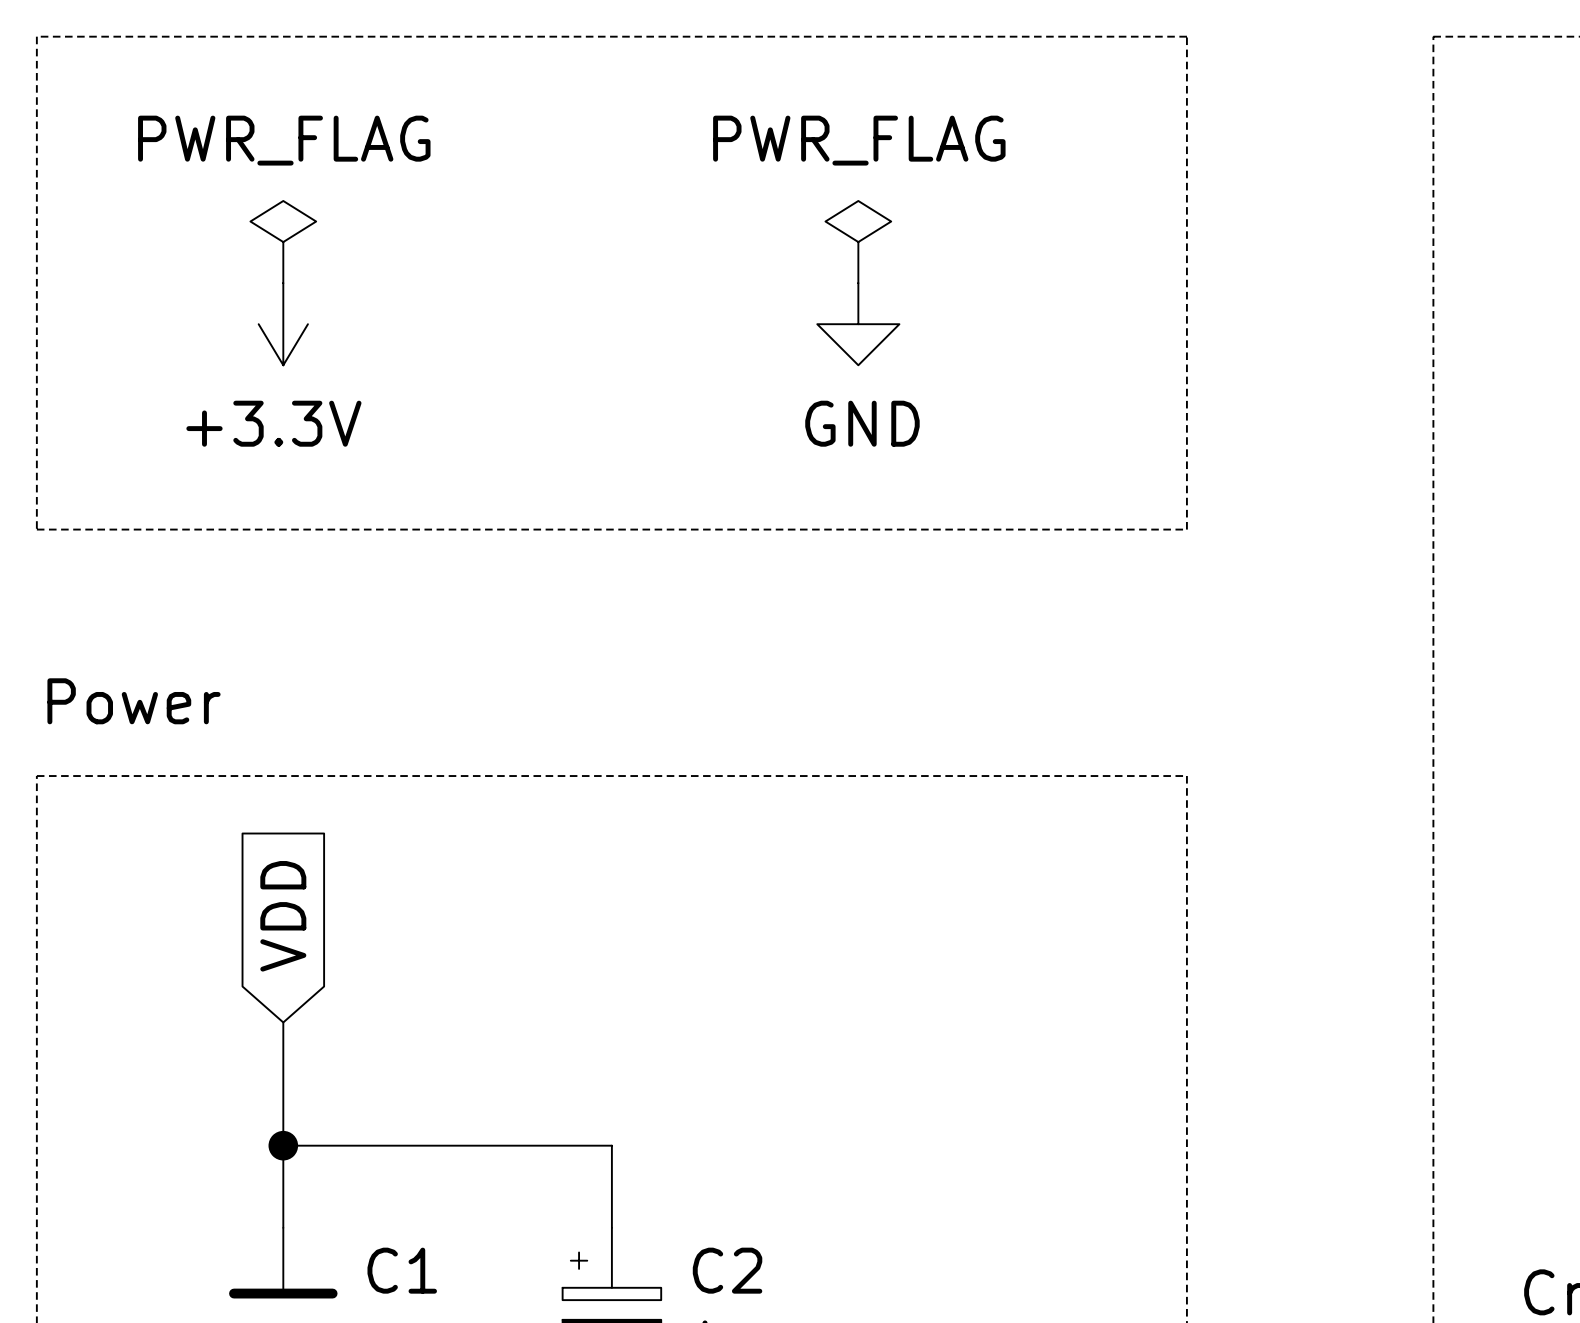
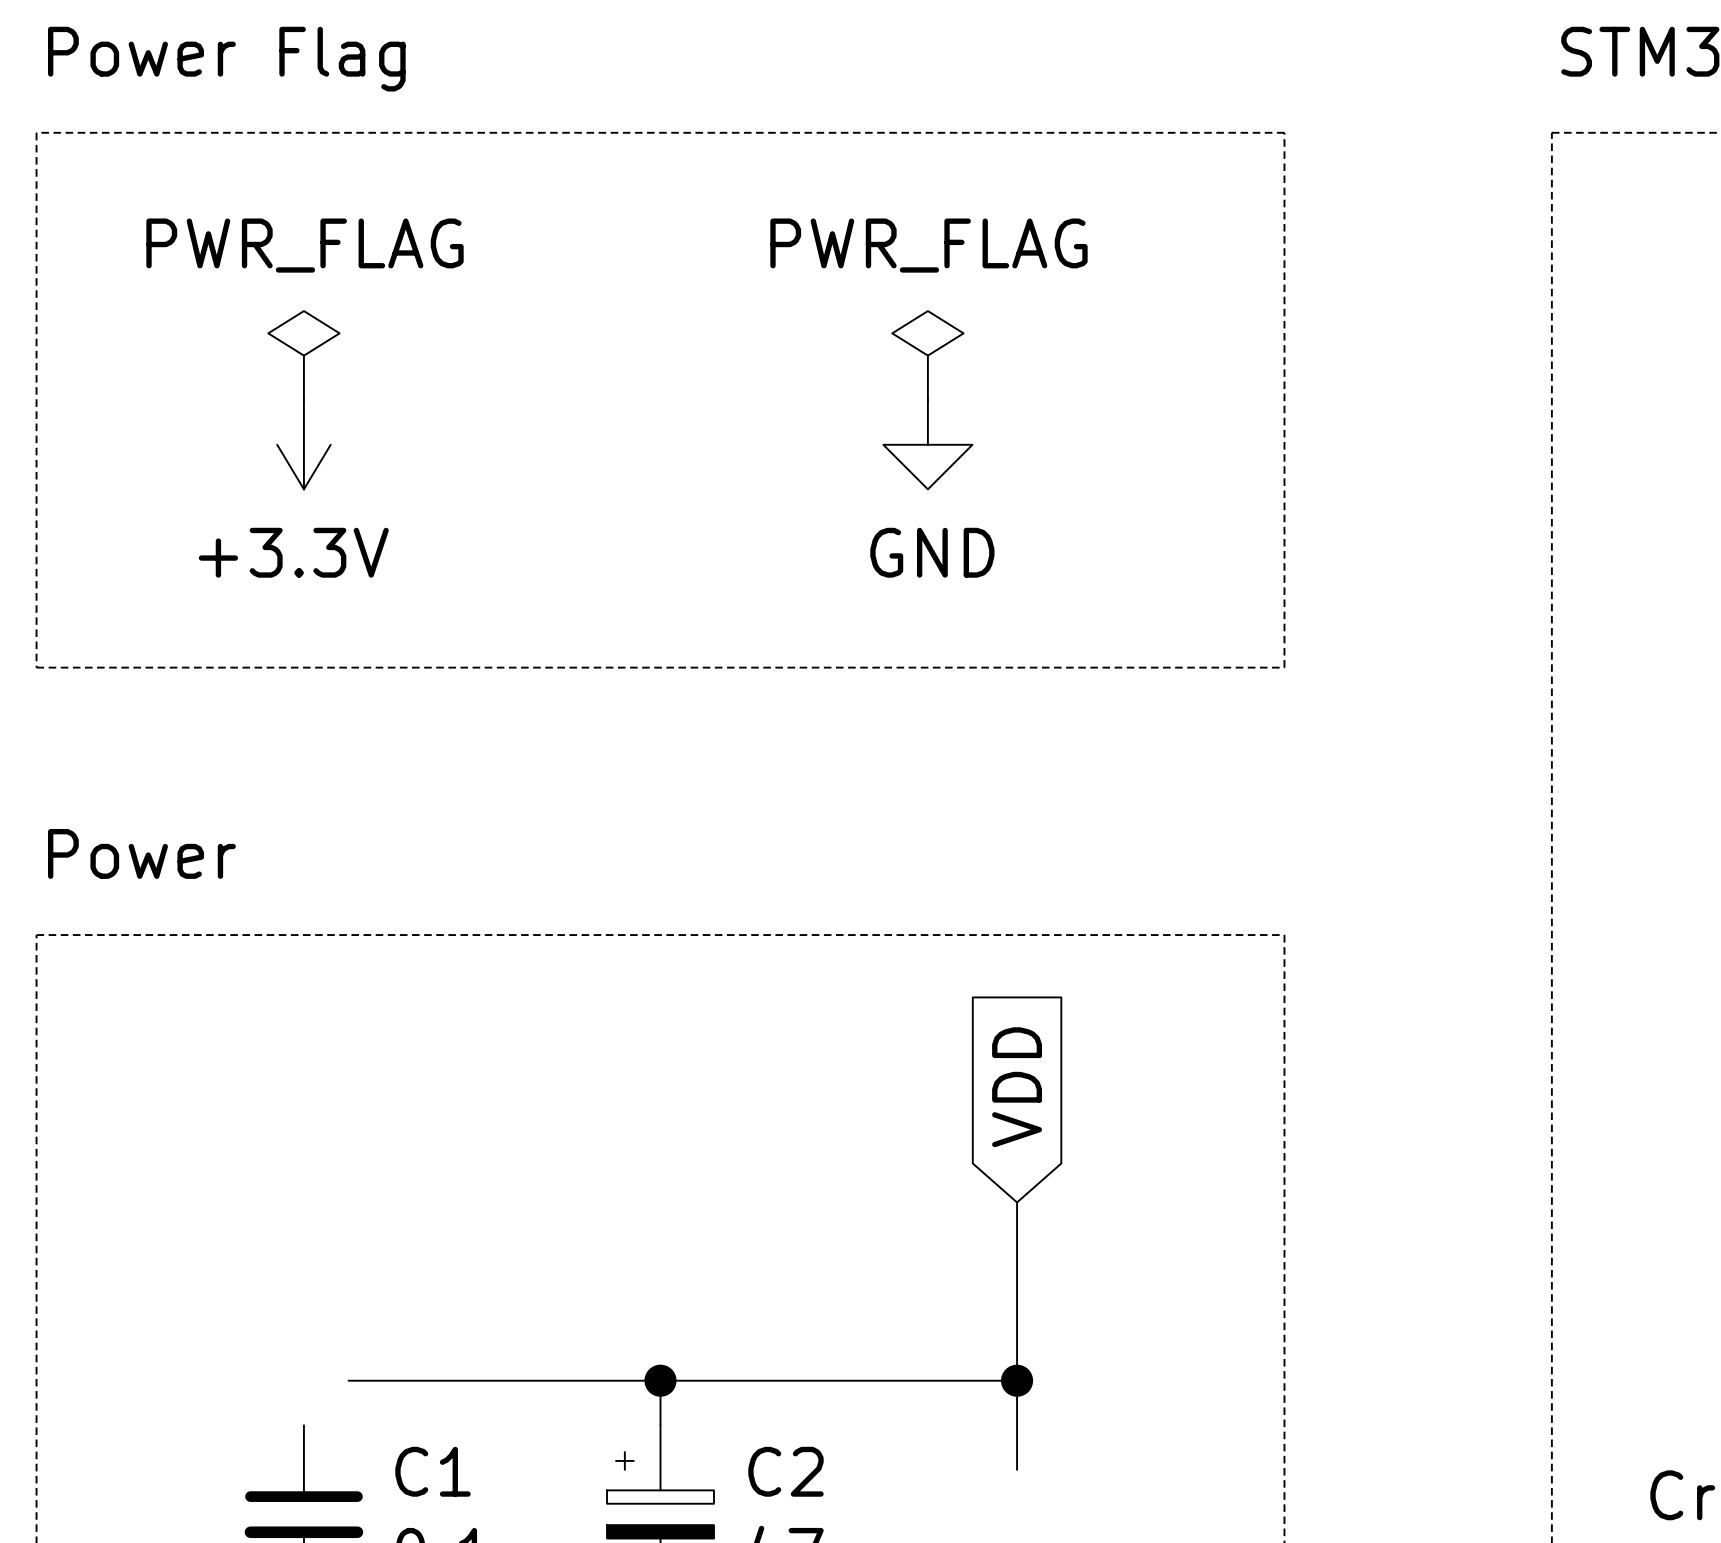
global label position: VDD (283, 916) -> VDD (1017, 1087)
wire: (283, 1022) (283, 1227) -> none
wire: none -> (1017, 1202) (1017, 1469)
wire: (283, 1145) (611, 1145) (611, 1186) -> none
junction: (283, 1145) -> none
wire: none -> (348, 1380) (1017, 1380)
junction: none -> (660, 1380)
junction: none -> (1017, 1380)

